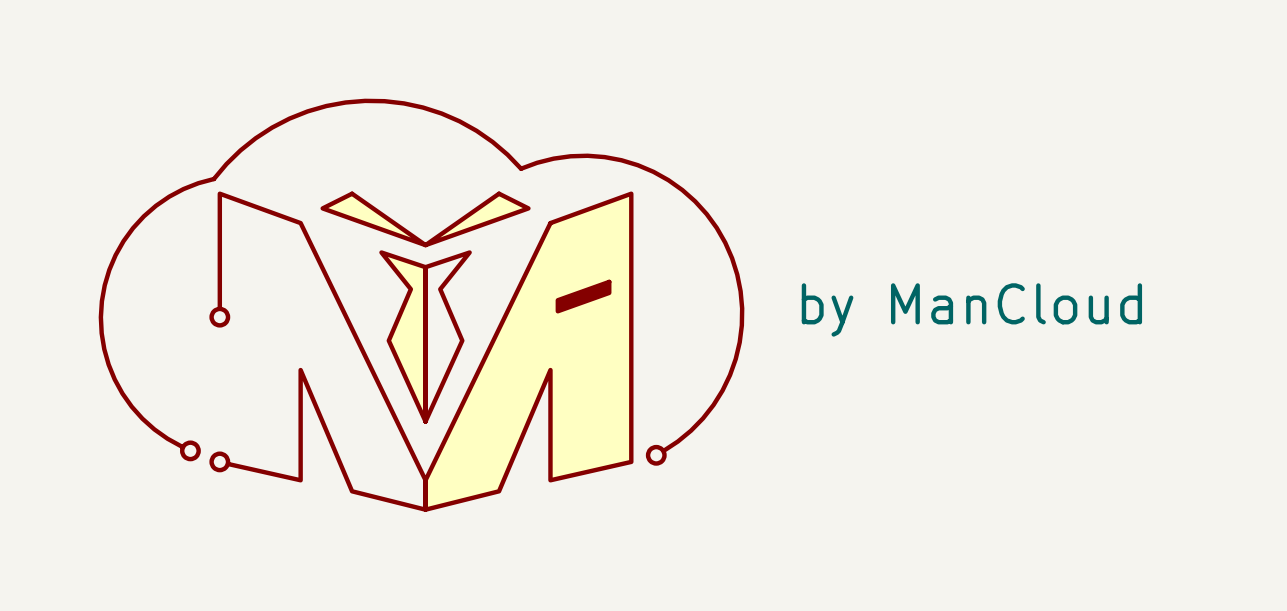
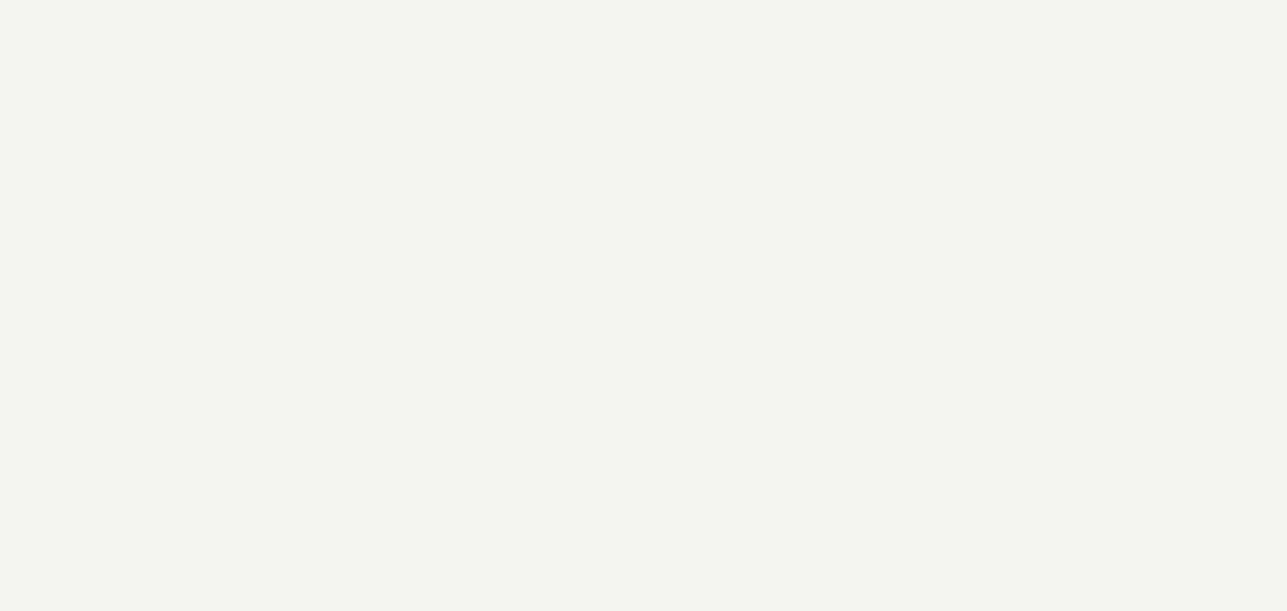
part: by ManCloud (421, 305) -> none

